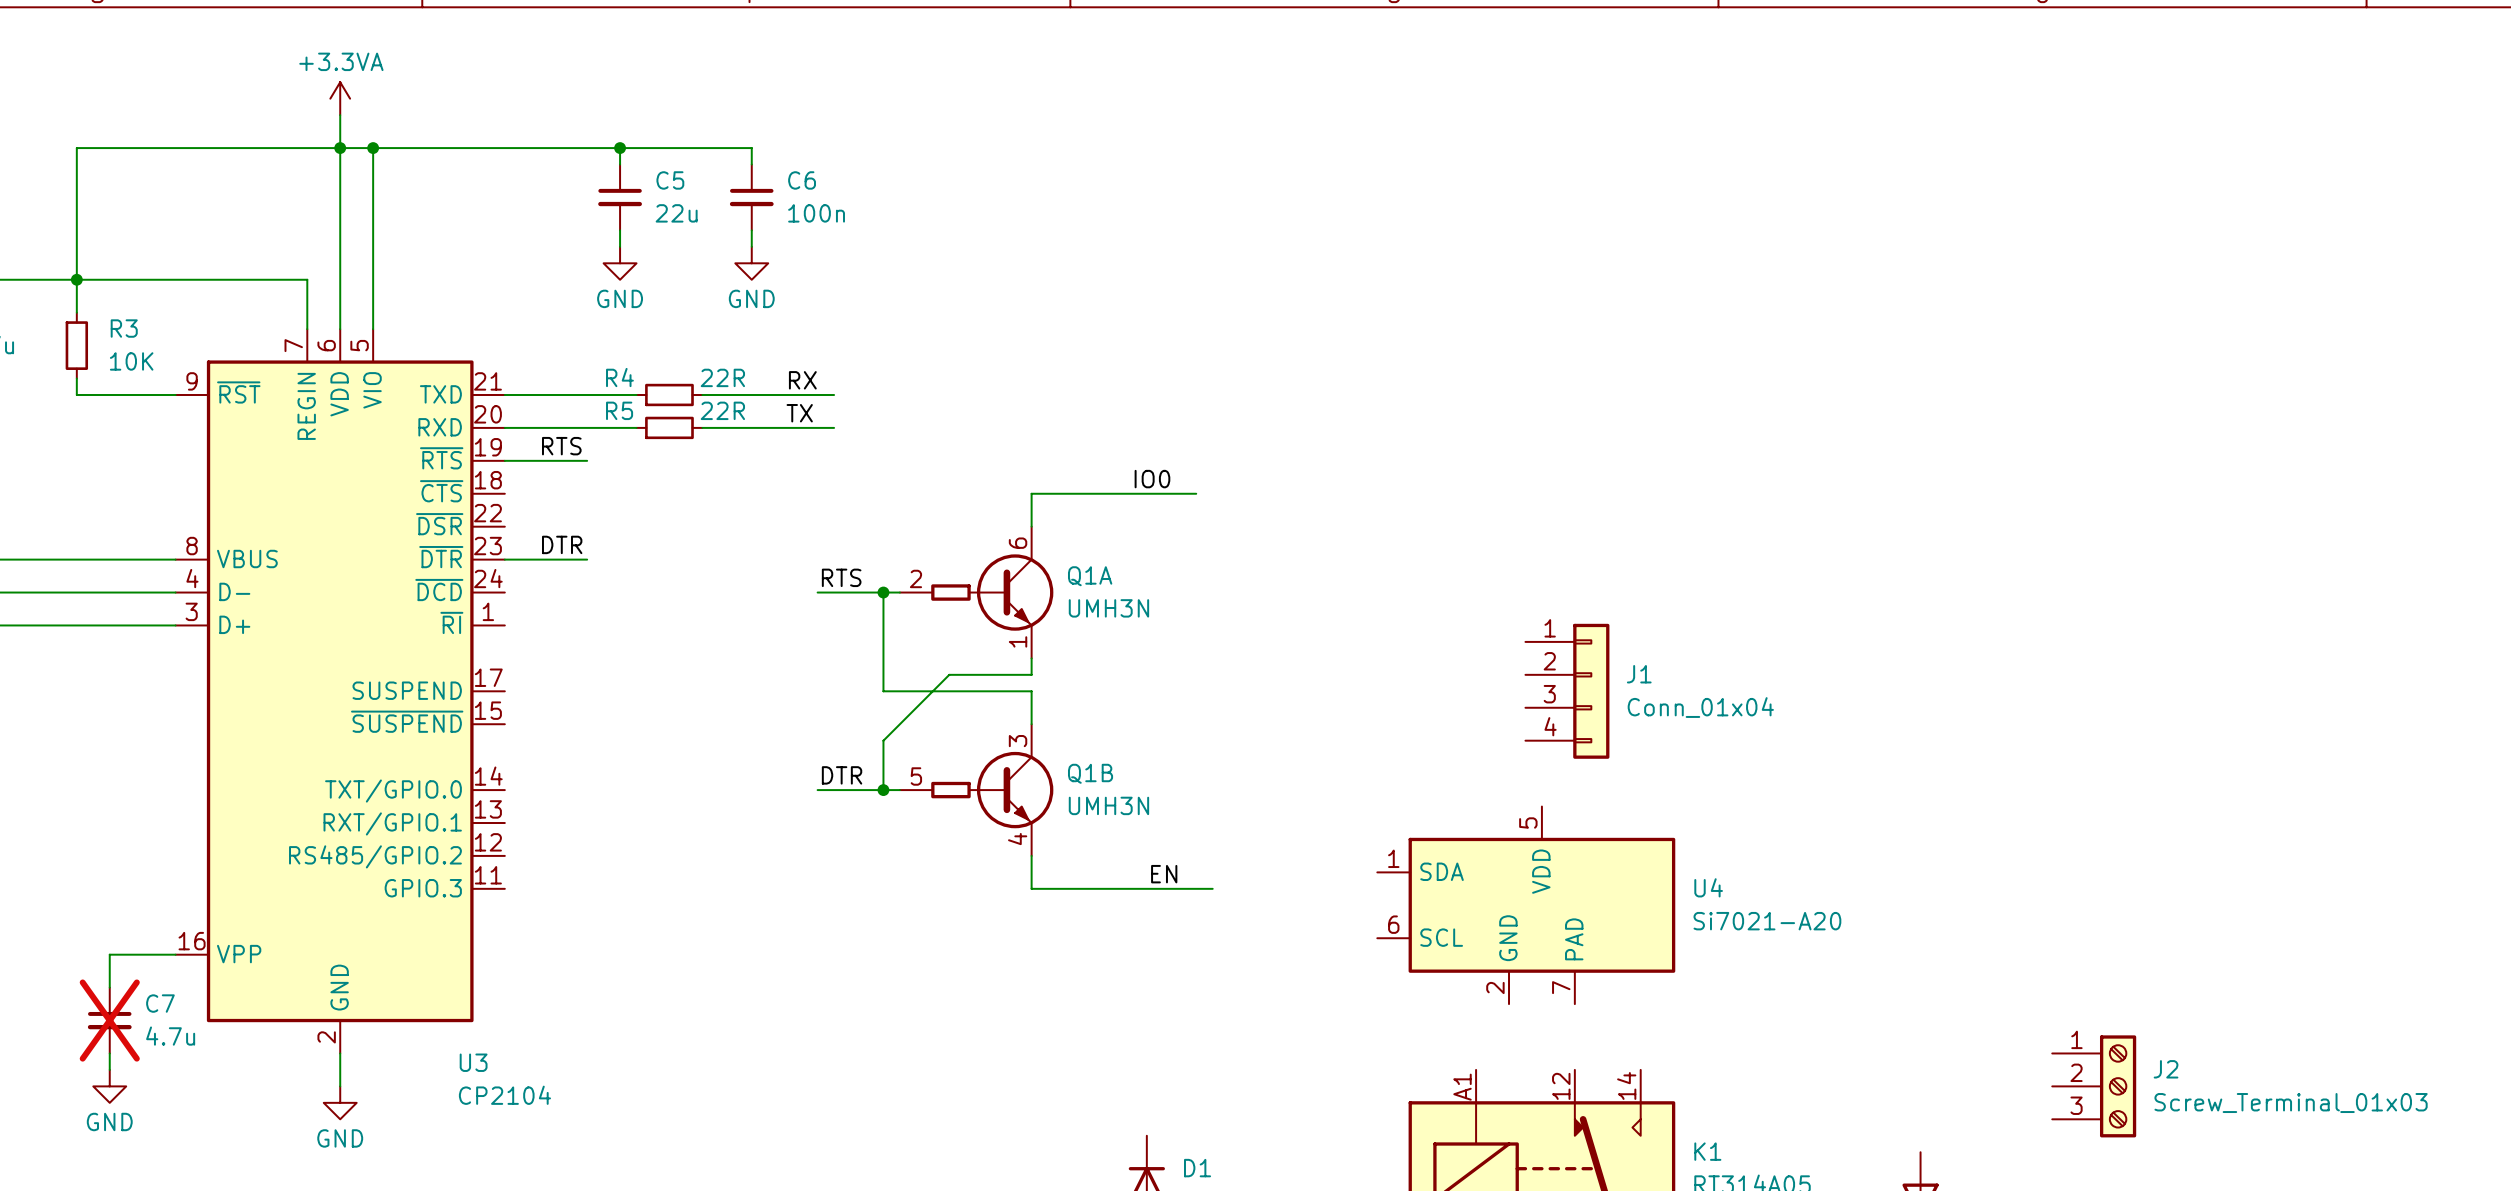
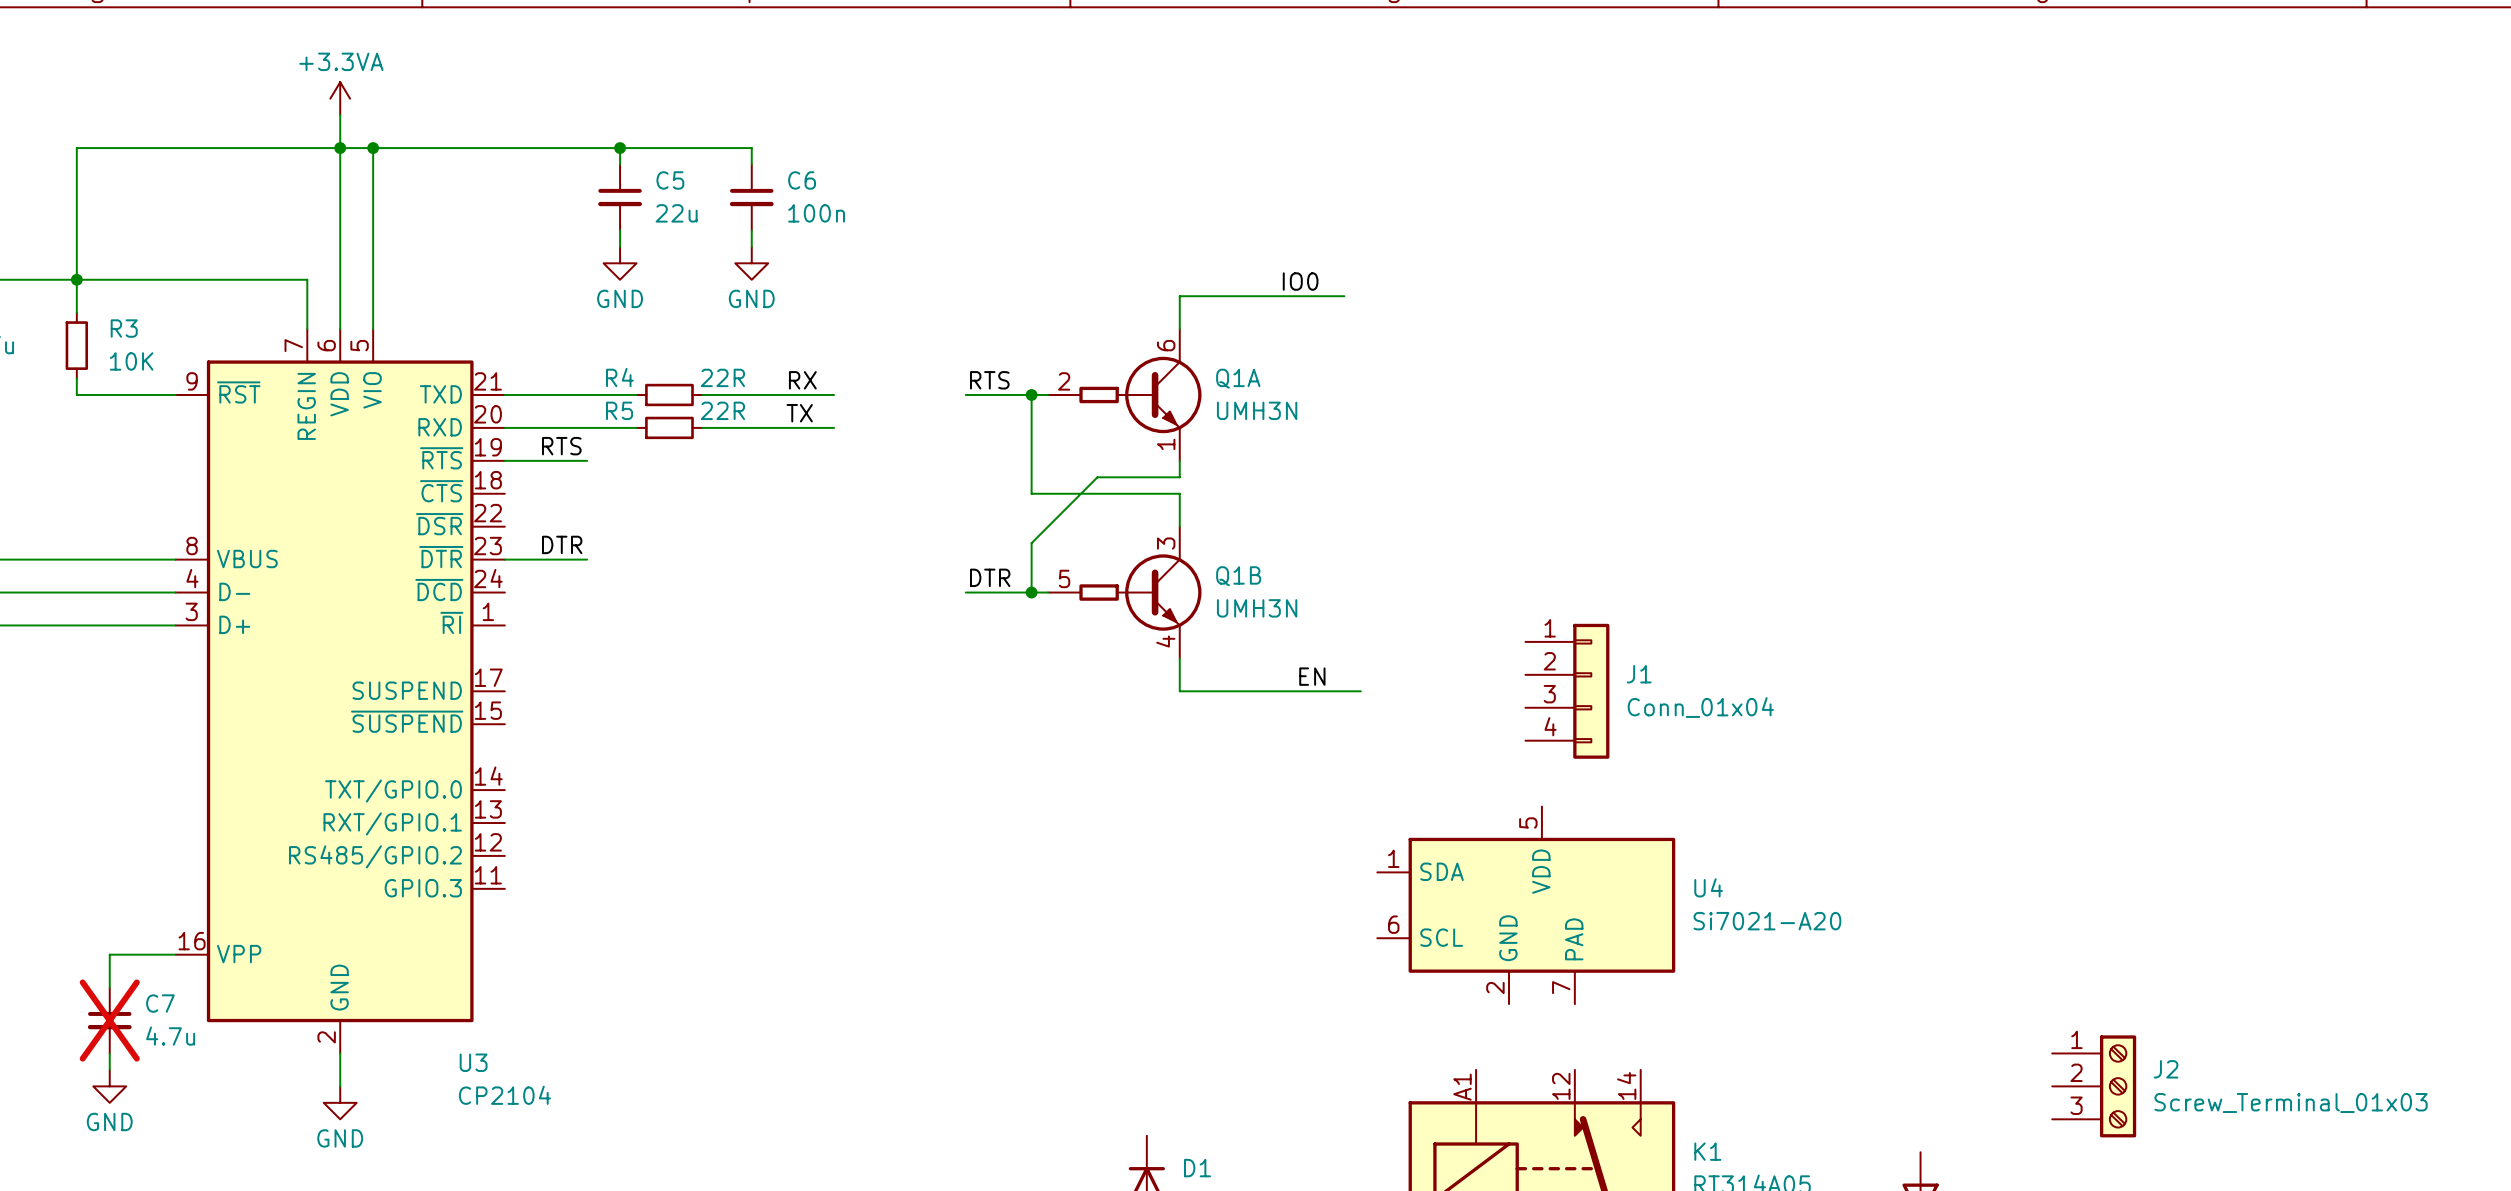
wire: none -> (1344, 296) (1179, 296) (1179, 329)
junction: none -> (1031, 394)
label position: IO0 (1152, 479) -> IO0 (1300, 281)
wire: (1031, 493) (1031, 526) -> (1031, 493) (1031, 394)
wire: (1179, 493) (1196, 493) -> (1179, 493) (1179, 526)
label position: RTS (841, 577) -> RTS (989, 380)
wire: (817, 592) (899, 592) -> (965, 394) (1048, 394)
wire: (883, 592) (883, 691) (1031, 691) (1031, 724) -> none
junction: (883, 592) -> none
Q1A position: (976, 592) -> (1124, 394)
junction: none -> (1031, 592)
wire: (1031, 658) (1031, 674) (949, 674) (883, 740) (883, 790) -> (1179, 460) (1179, 477) (1097, 477) (1031, 543) (1031, 592)
label position: DTR (842, 775) -> DTR (990, 577)
wire: (817, 790) (899, 790) -> (965, 592) (1048, 592)
junction: (883, 790) -> none
Q1B position: (976, 790) -> (1124, 592)
wire: (1031, 855) (1031, 888) (1212, 888) -> (1179, 658) (1179, 691) (1360, 691)
label position: EN (1164, 874) -> EN (1312, 676)

